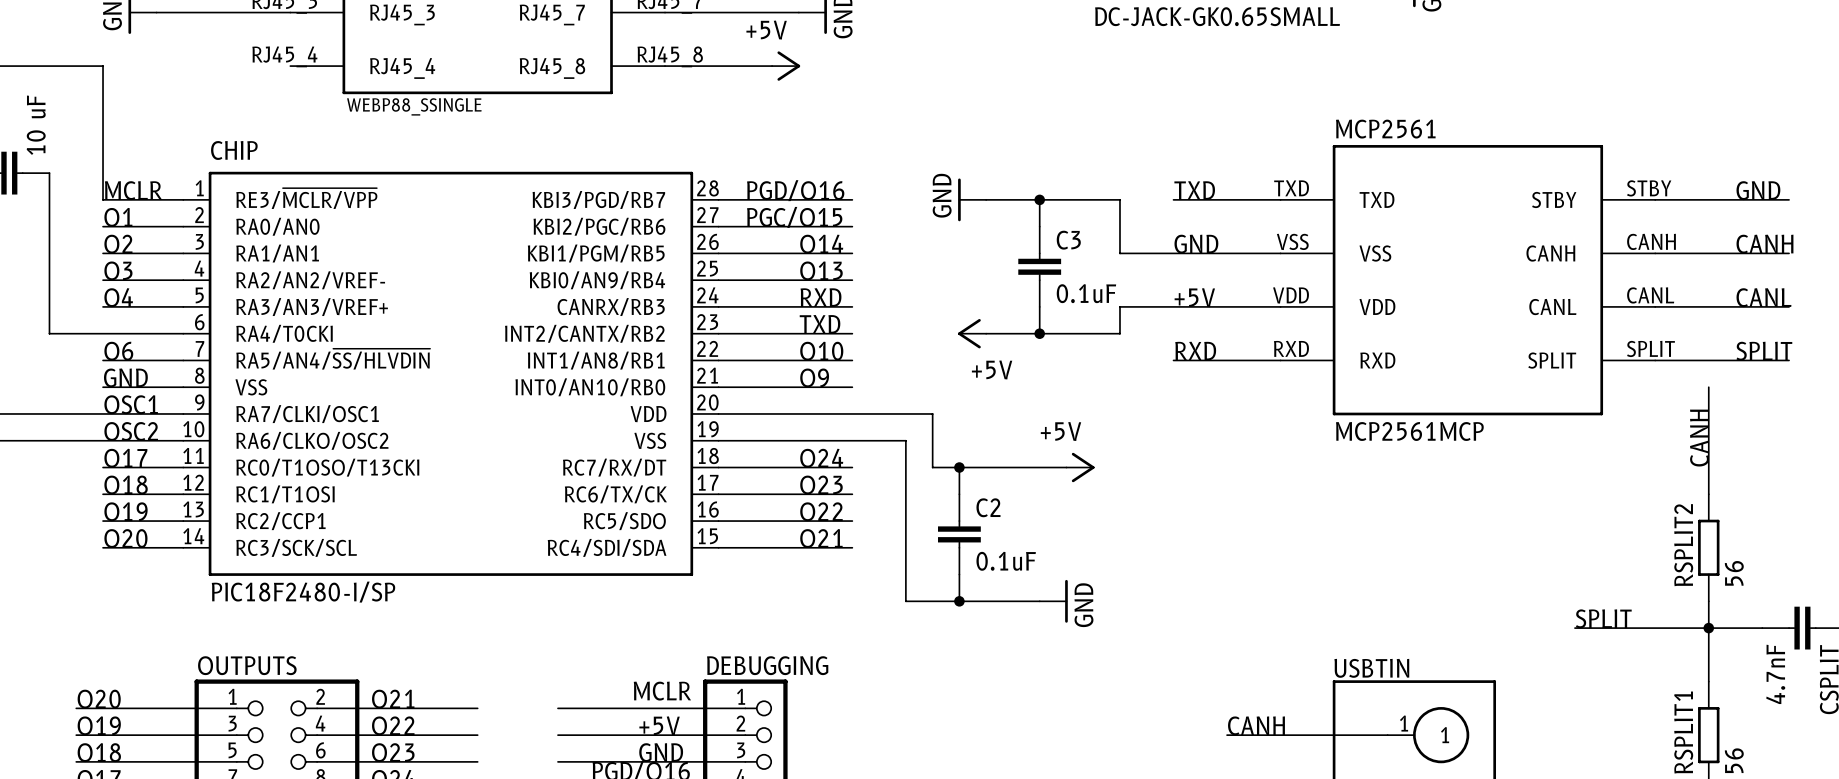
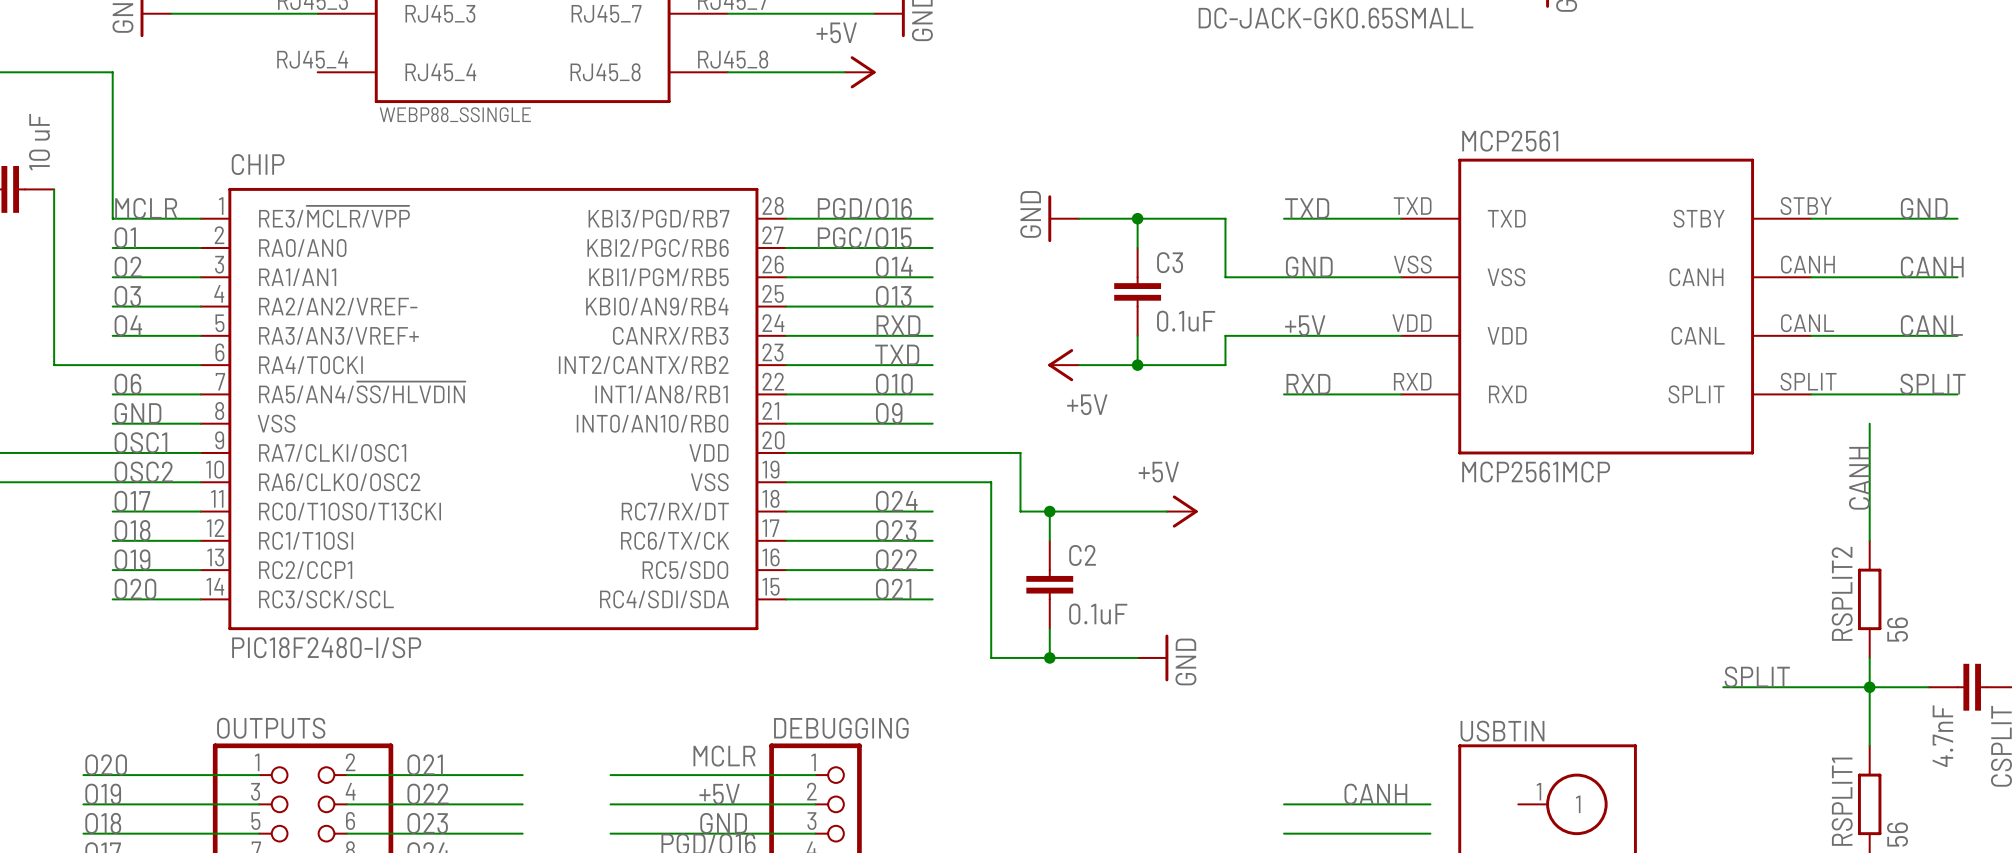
wire: none -> (1284, 804) (1342, 804)
wire: (1307, 735) (1387, 735) -> none
wire: none -> (1284, 833) (1430, 833)

